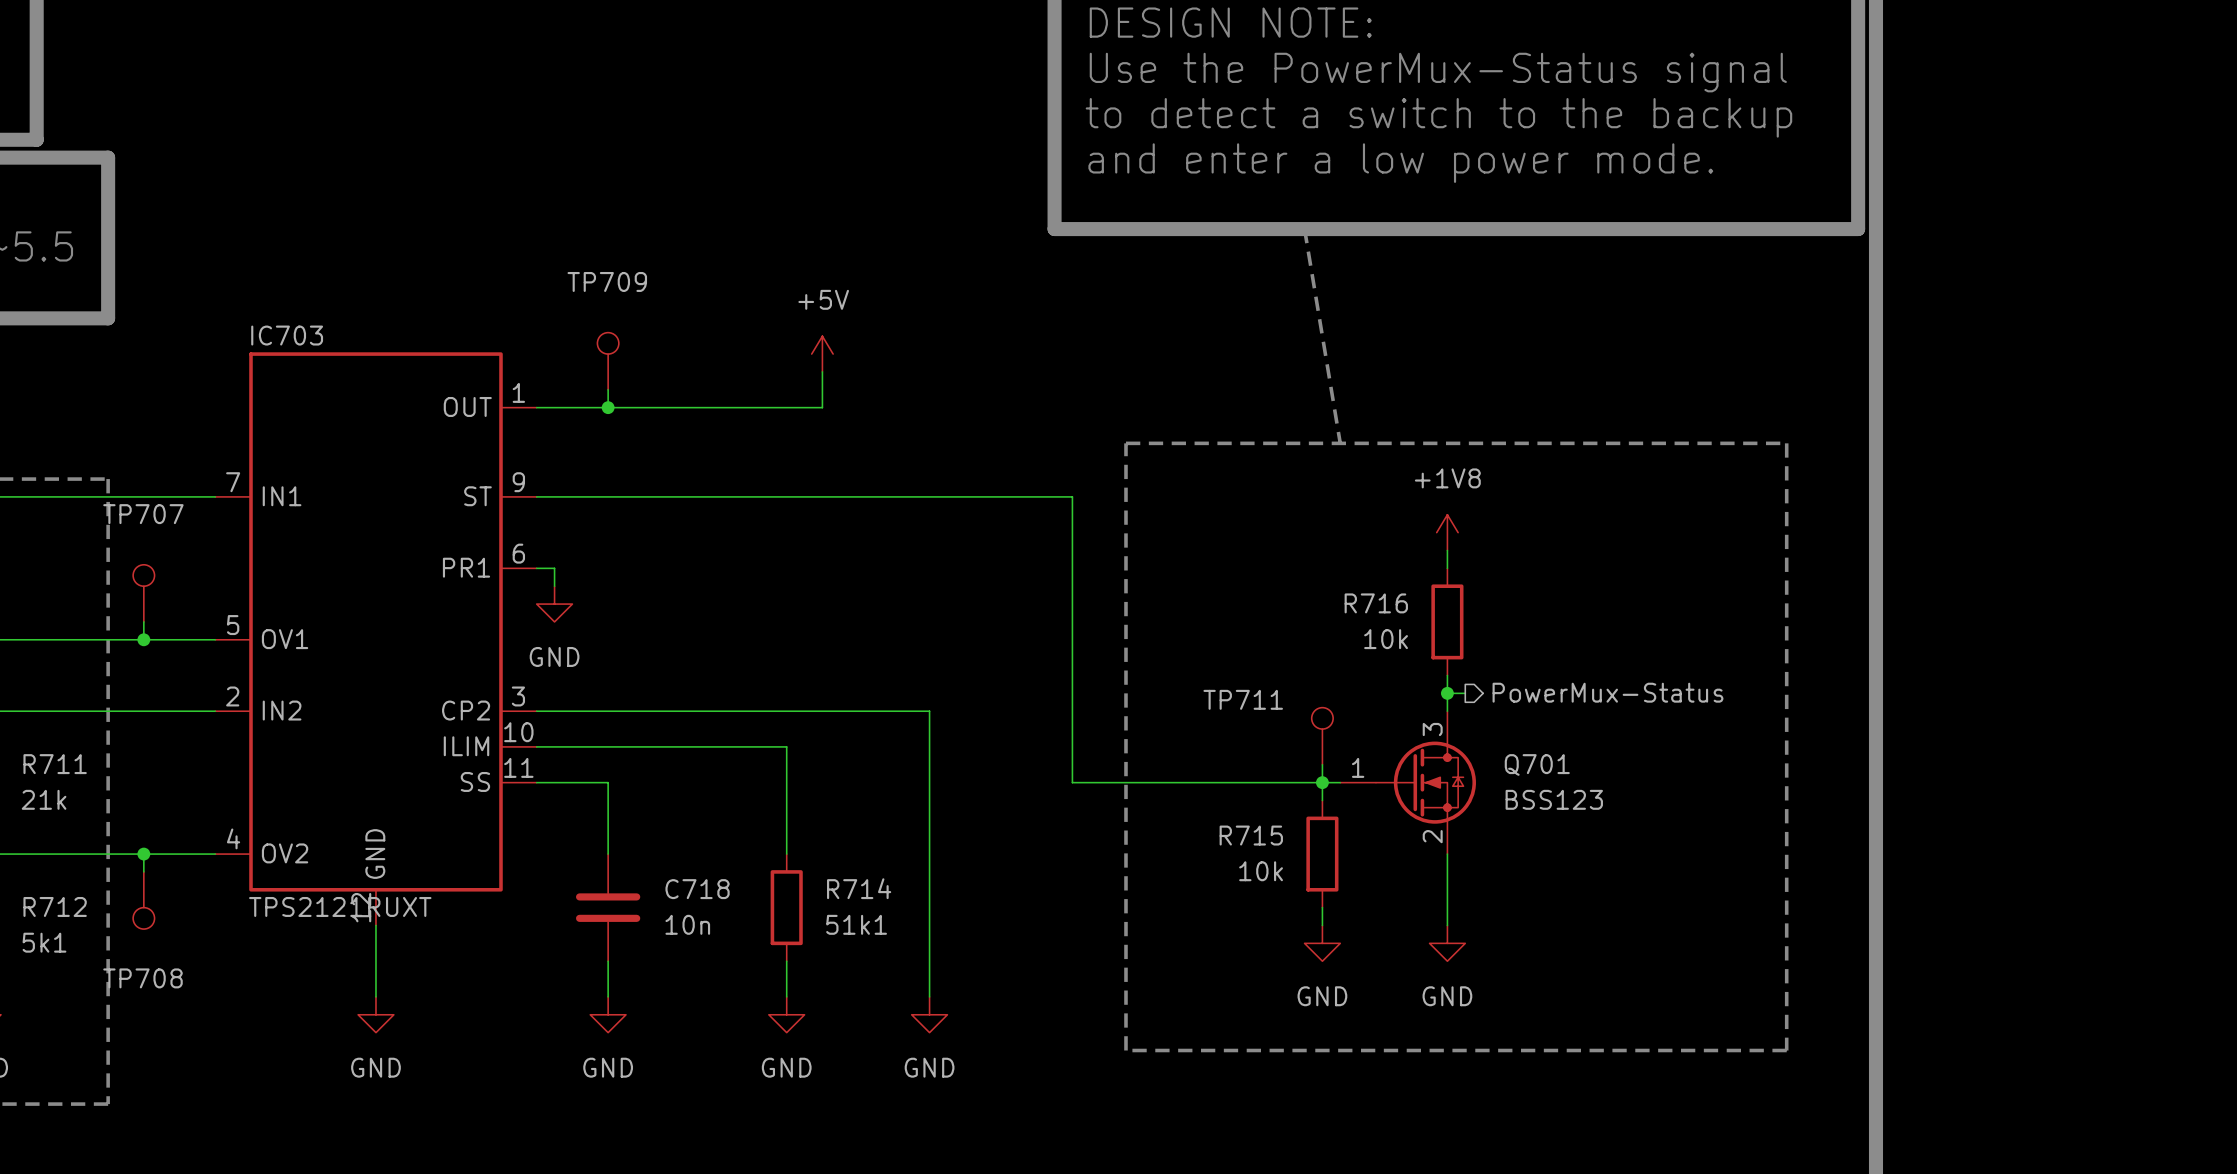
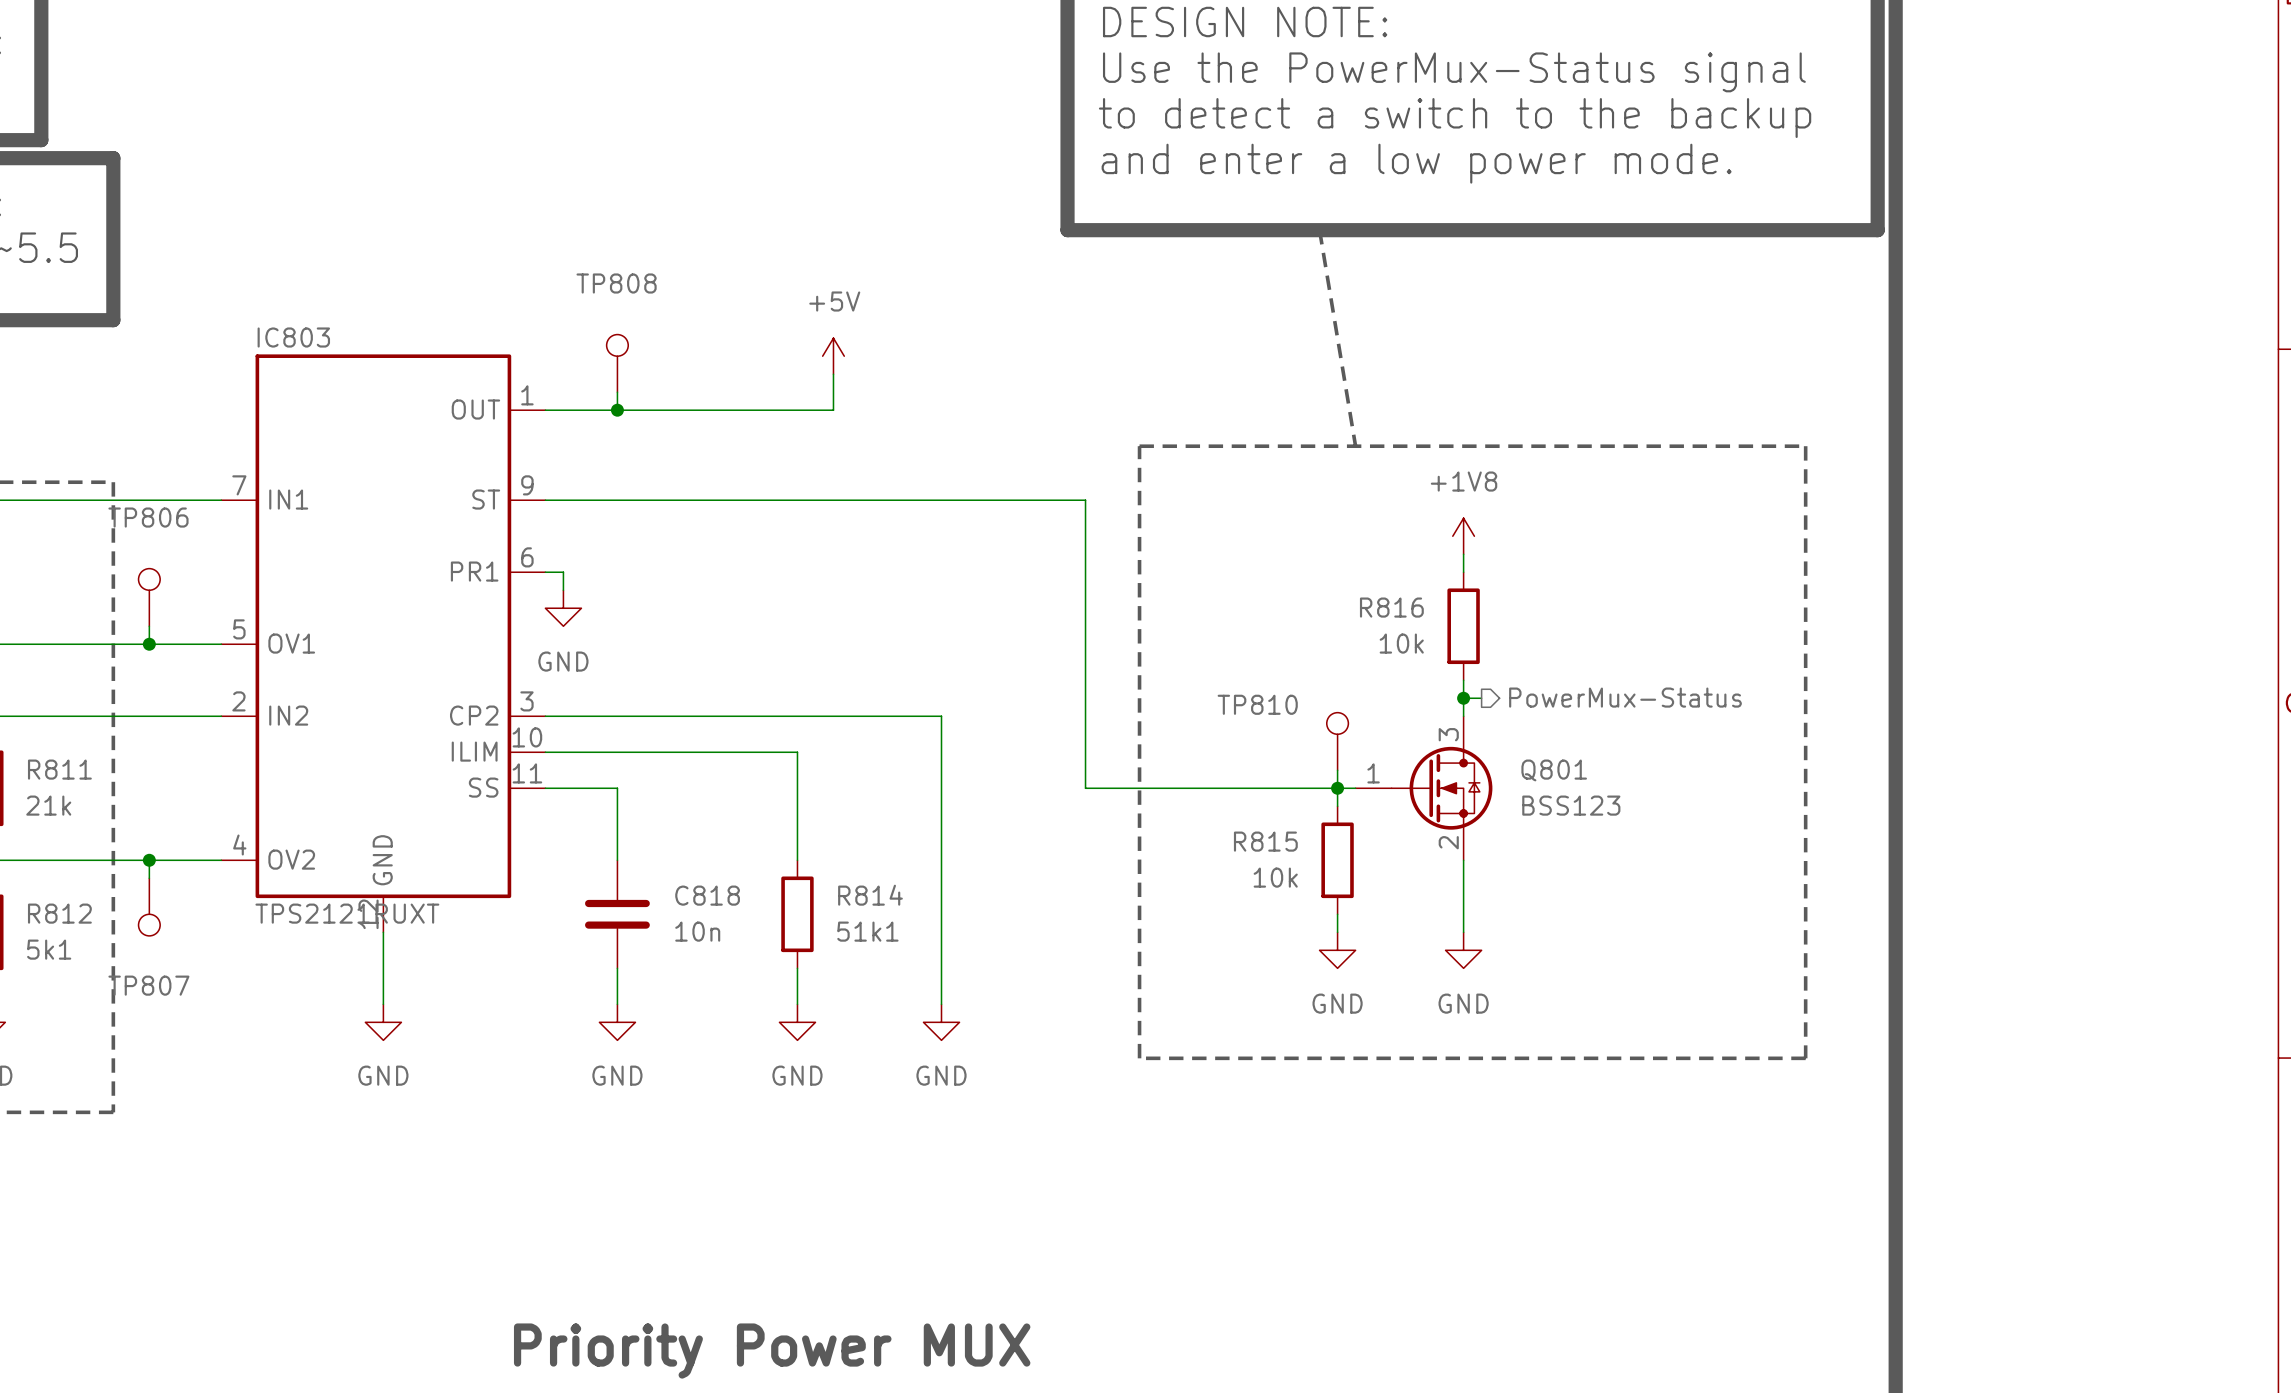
TP709 name: TP709 (607, 281) -> TP808 (616, 283)
IC703 name: IC703 (287, 335) -> IC803 (293, 337)
TP707 name: TP707 (143, 514) -> TP806 (148, 517)
R716 name: R716 (1376, 603) -> R816 (1391, 607)
TP711 name: TP711 (1243, 699) -> TP810 (1257, 704)
R711 name: R711 (55, 764) -> R811 (59, 769)
Q701 name: Q701 (1537, 764) -> Q801 (1554, 770)
R715 name: R715 (1251, 835) -> R815 (1265, 841)
R714 name: R714 (859, 888) -> R814 (870, 895)
C718 name: C718 (697, 889) -> C818 (707, 895)
R712 name: R712 (55, 906) -> R812 (59, 913)
TP708 name: TP708 (142, 978) -> TP807 (148, 985)

